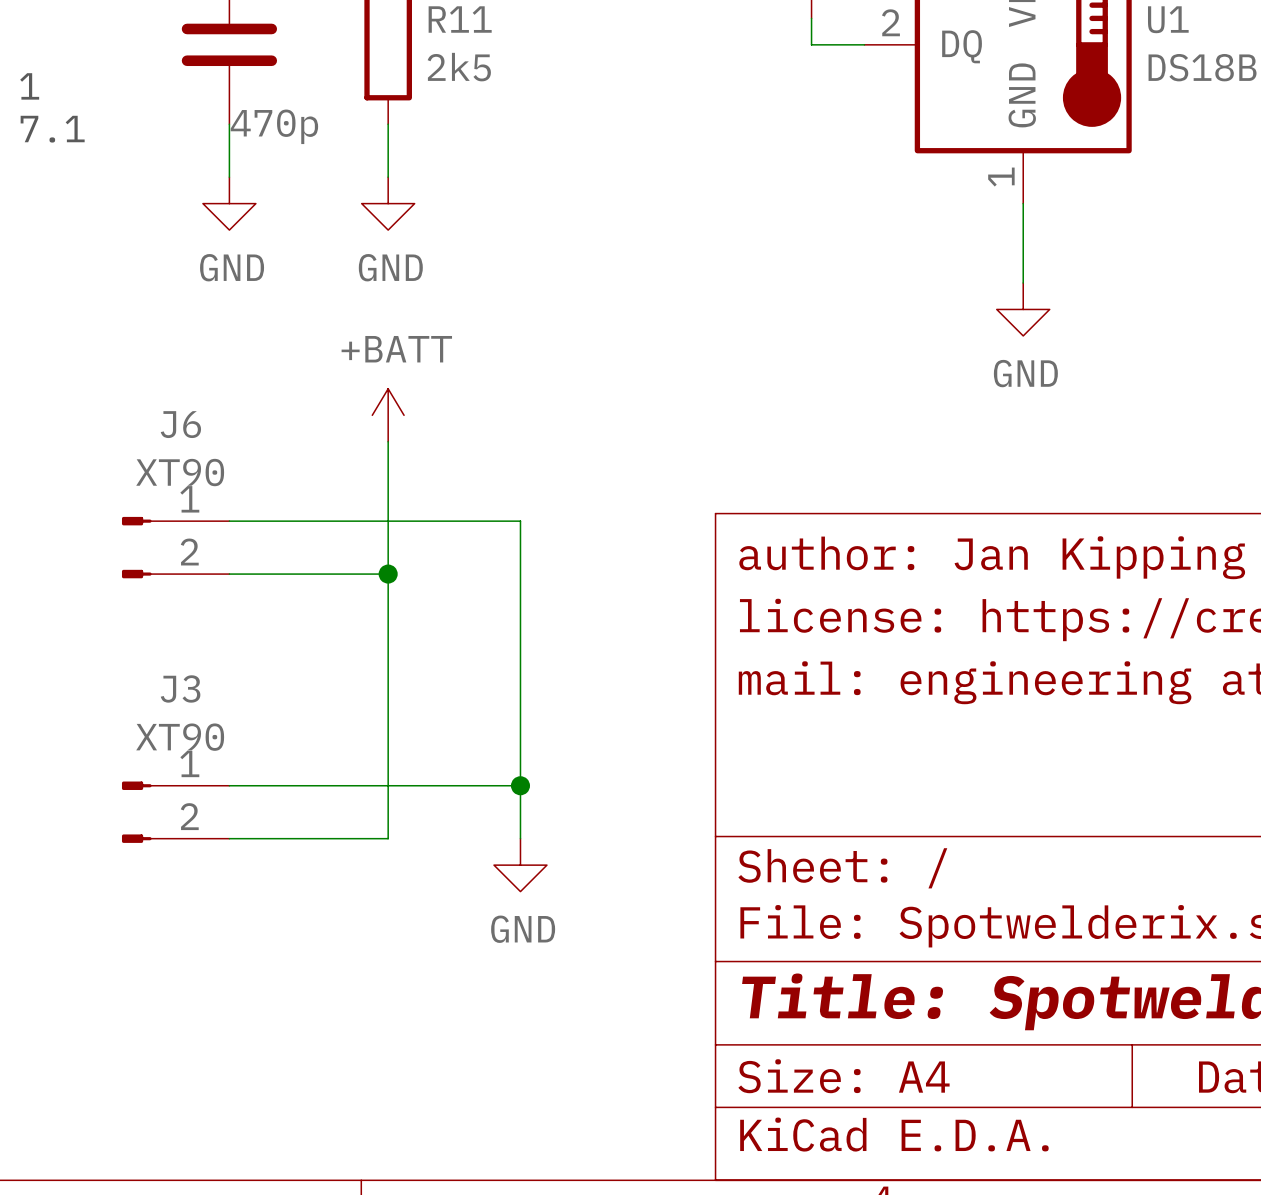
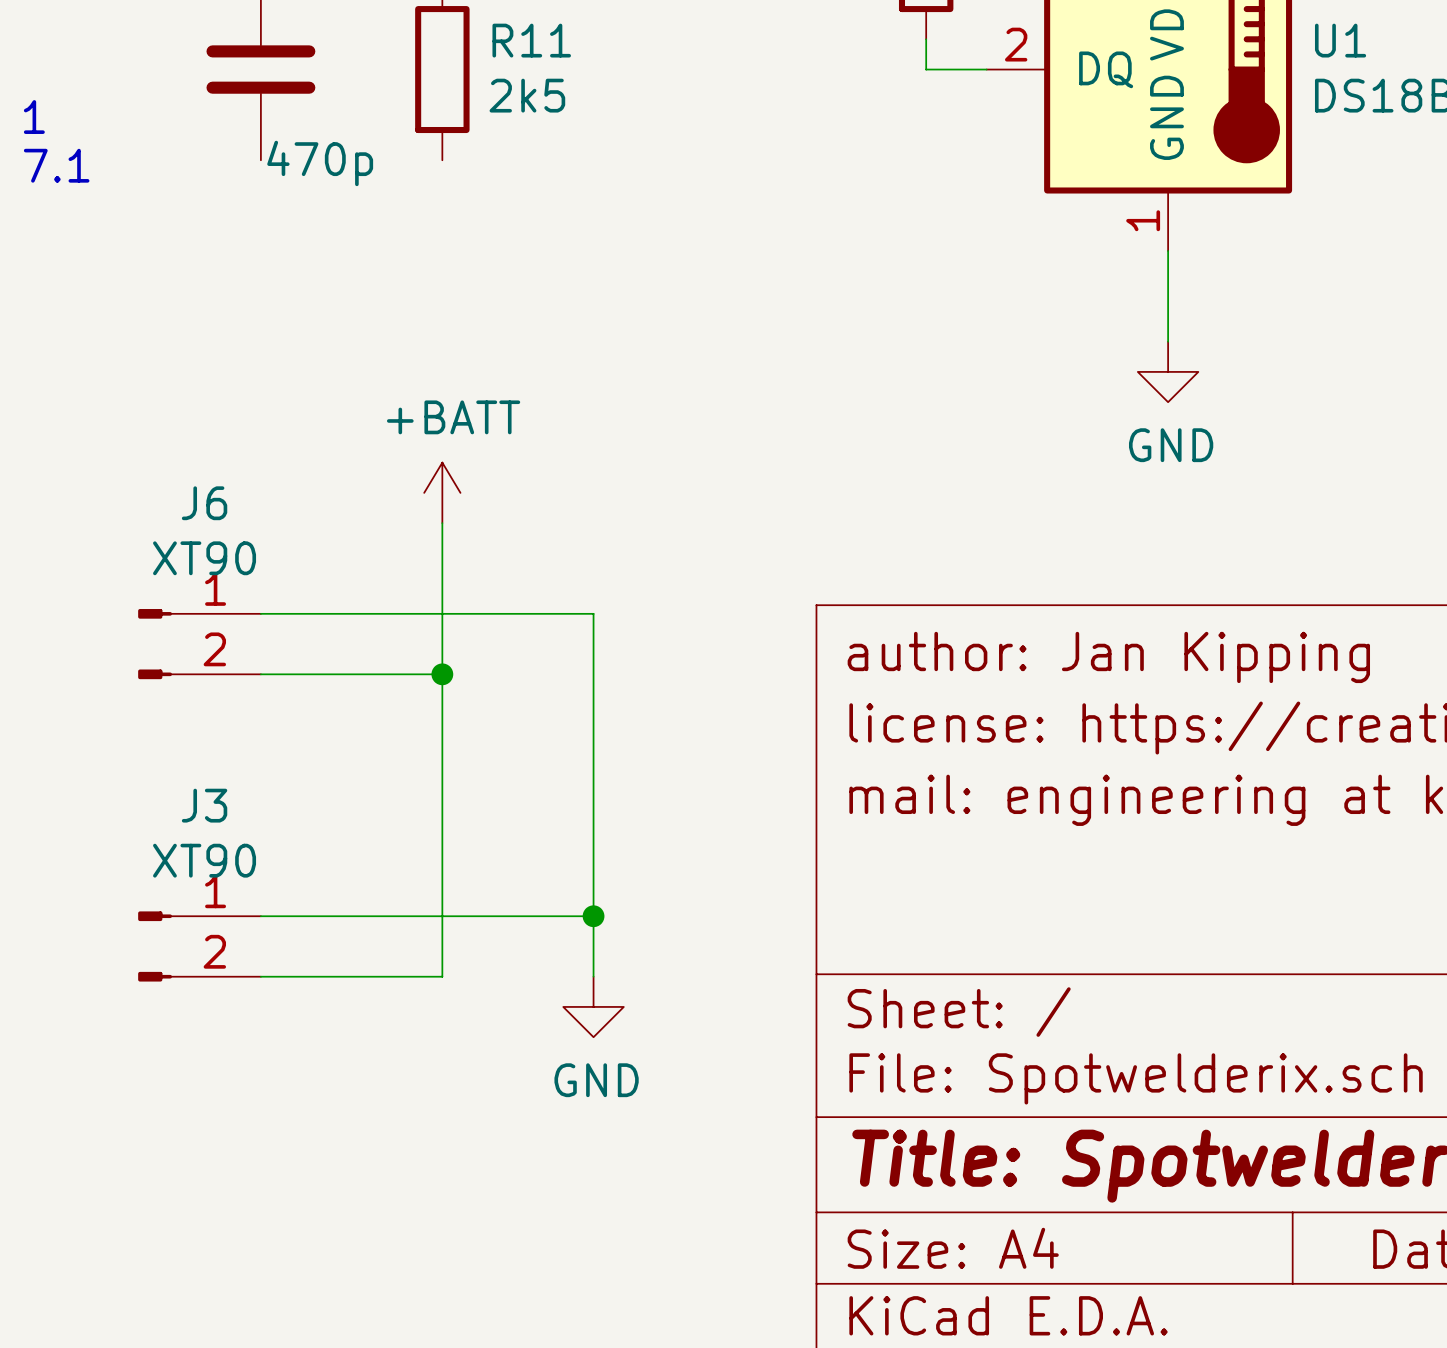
wire: (229, 124) (229, 177) -> none
wire: (388, 124) (388, 177) -> none
power symbol: GND (229, 203) -> none
power symbol: GND (388, 203) -> none

